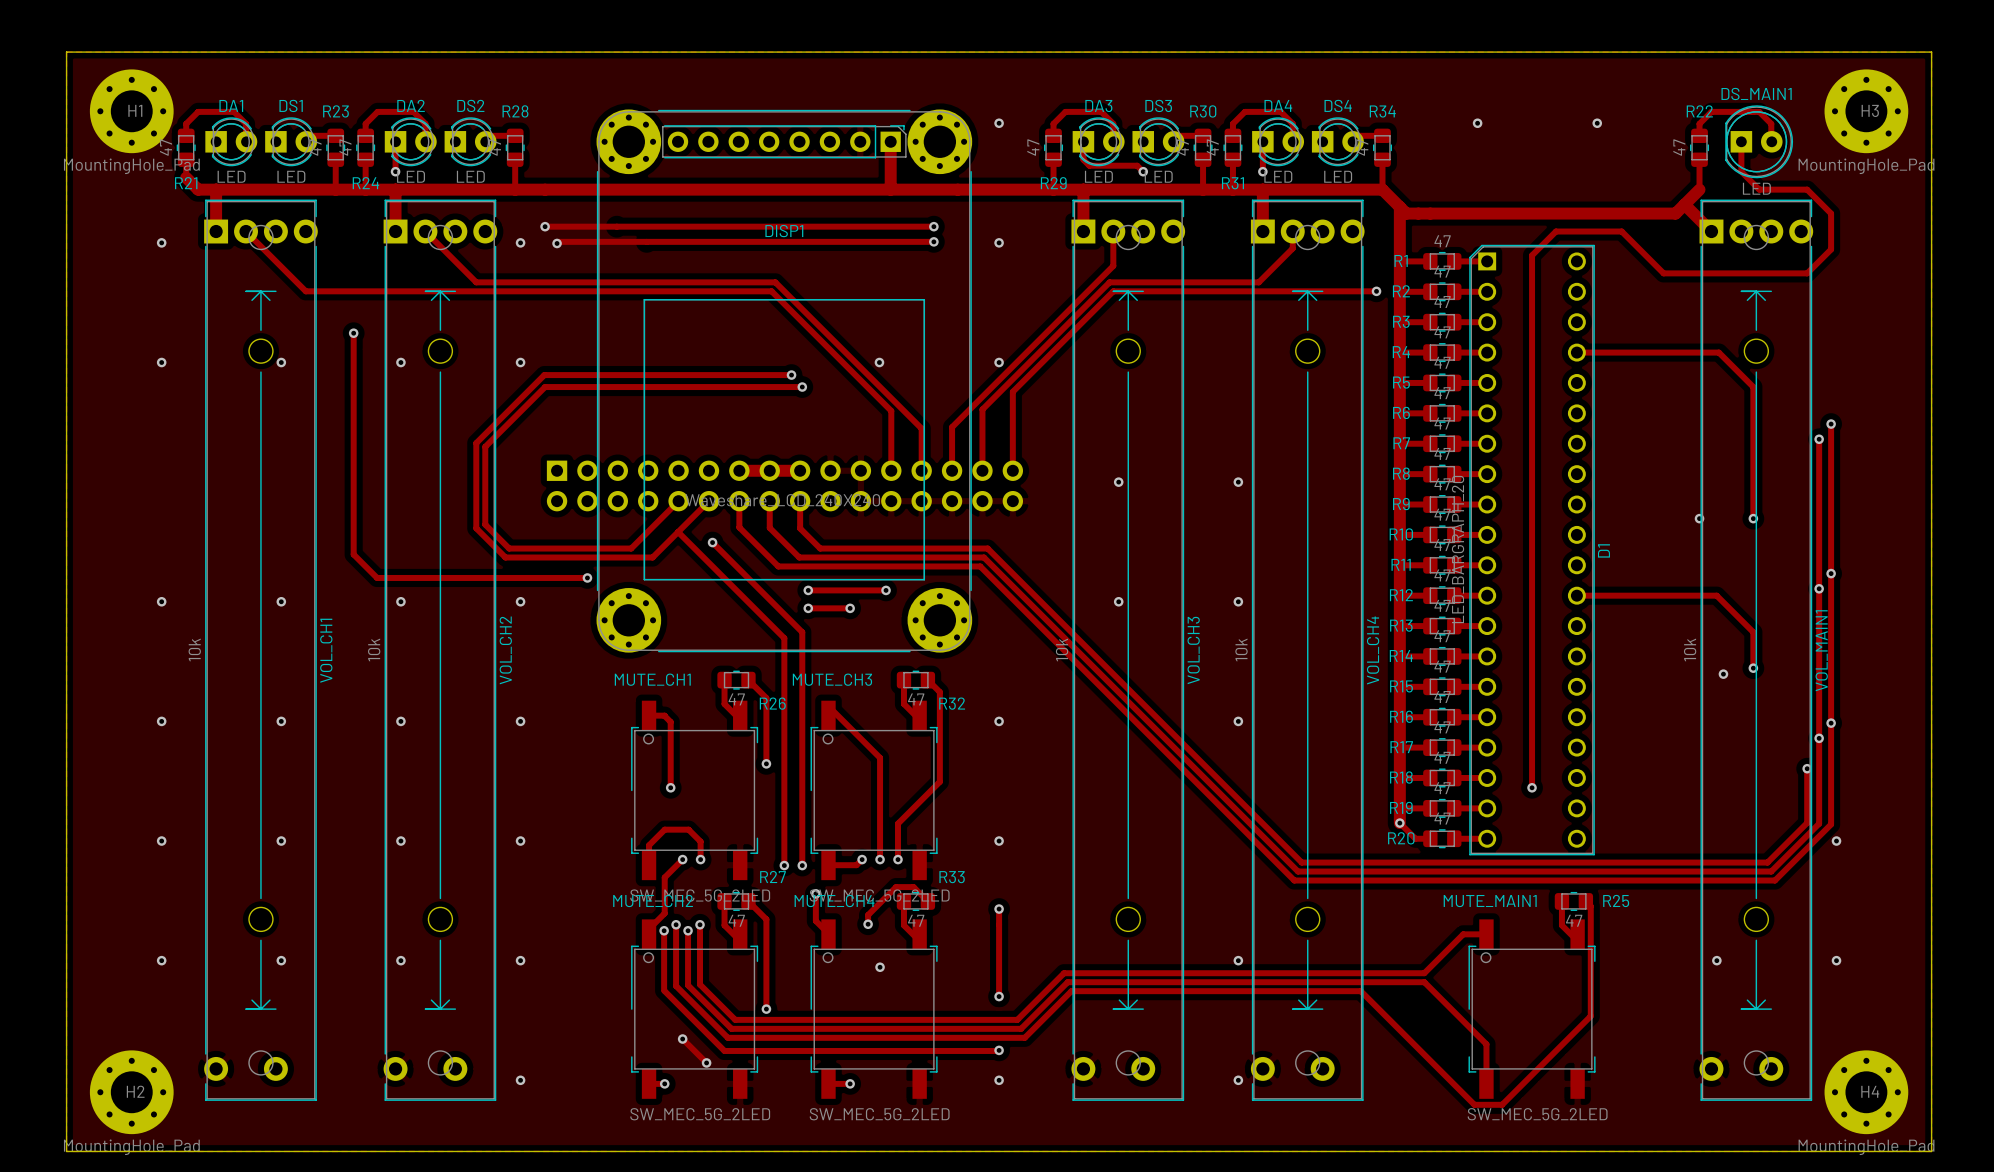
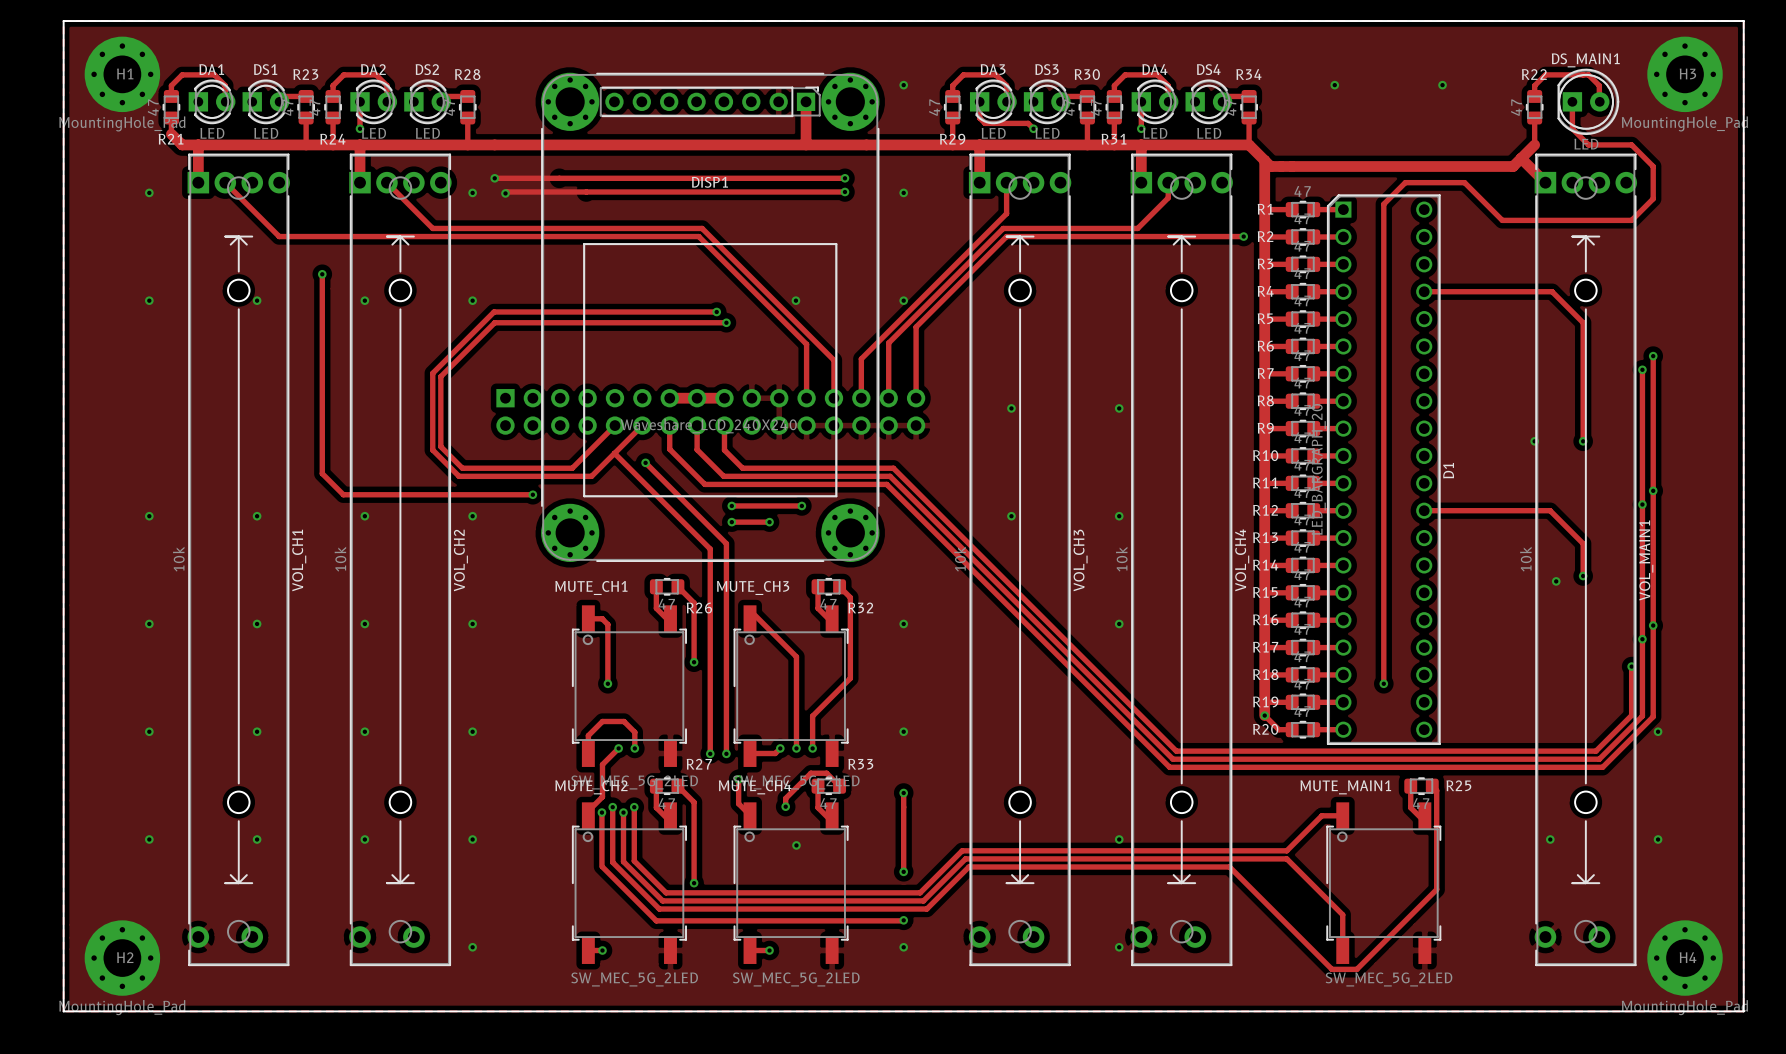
track: (682, 1039) (706, 1062) -> none
via: (682, 1039) -> none
via: (706, 1062) -> none

